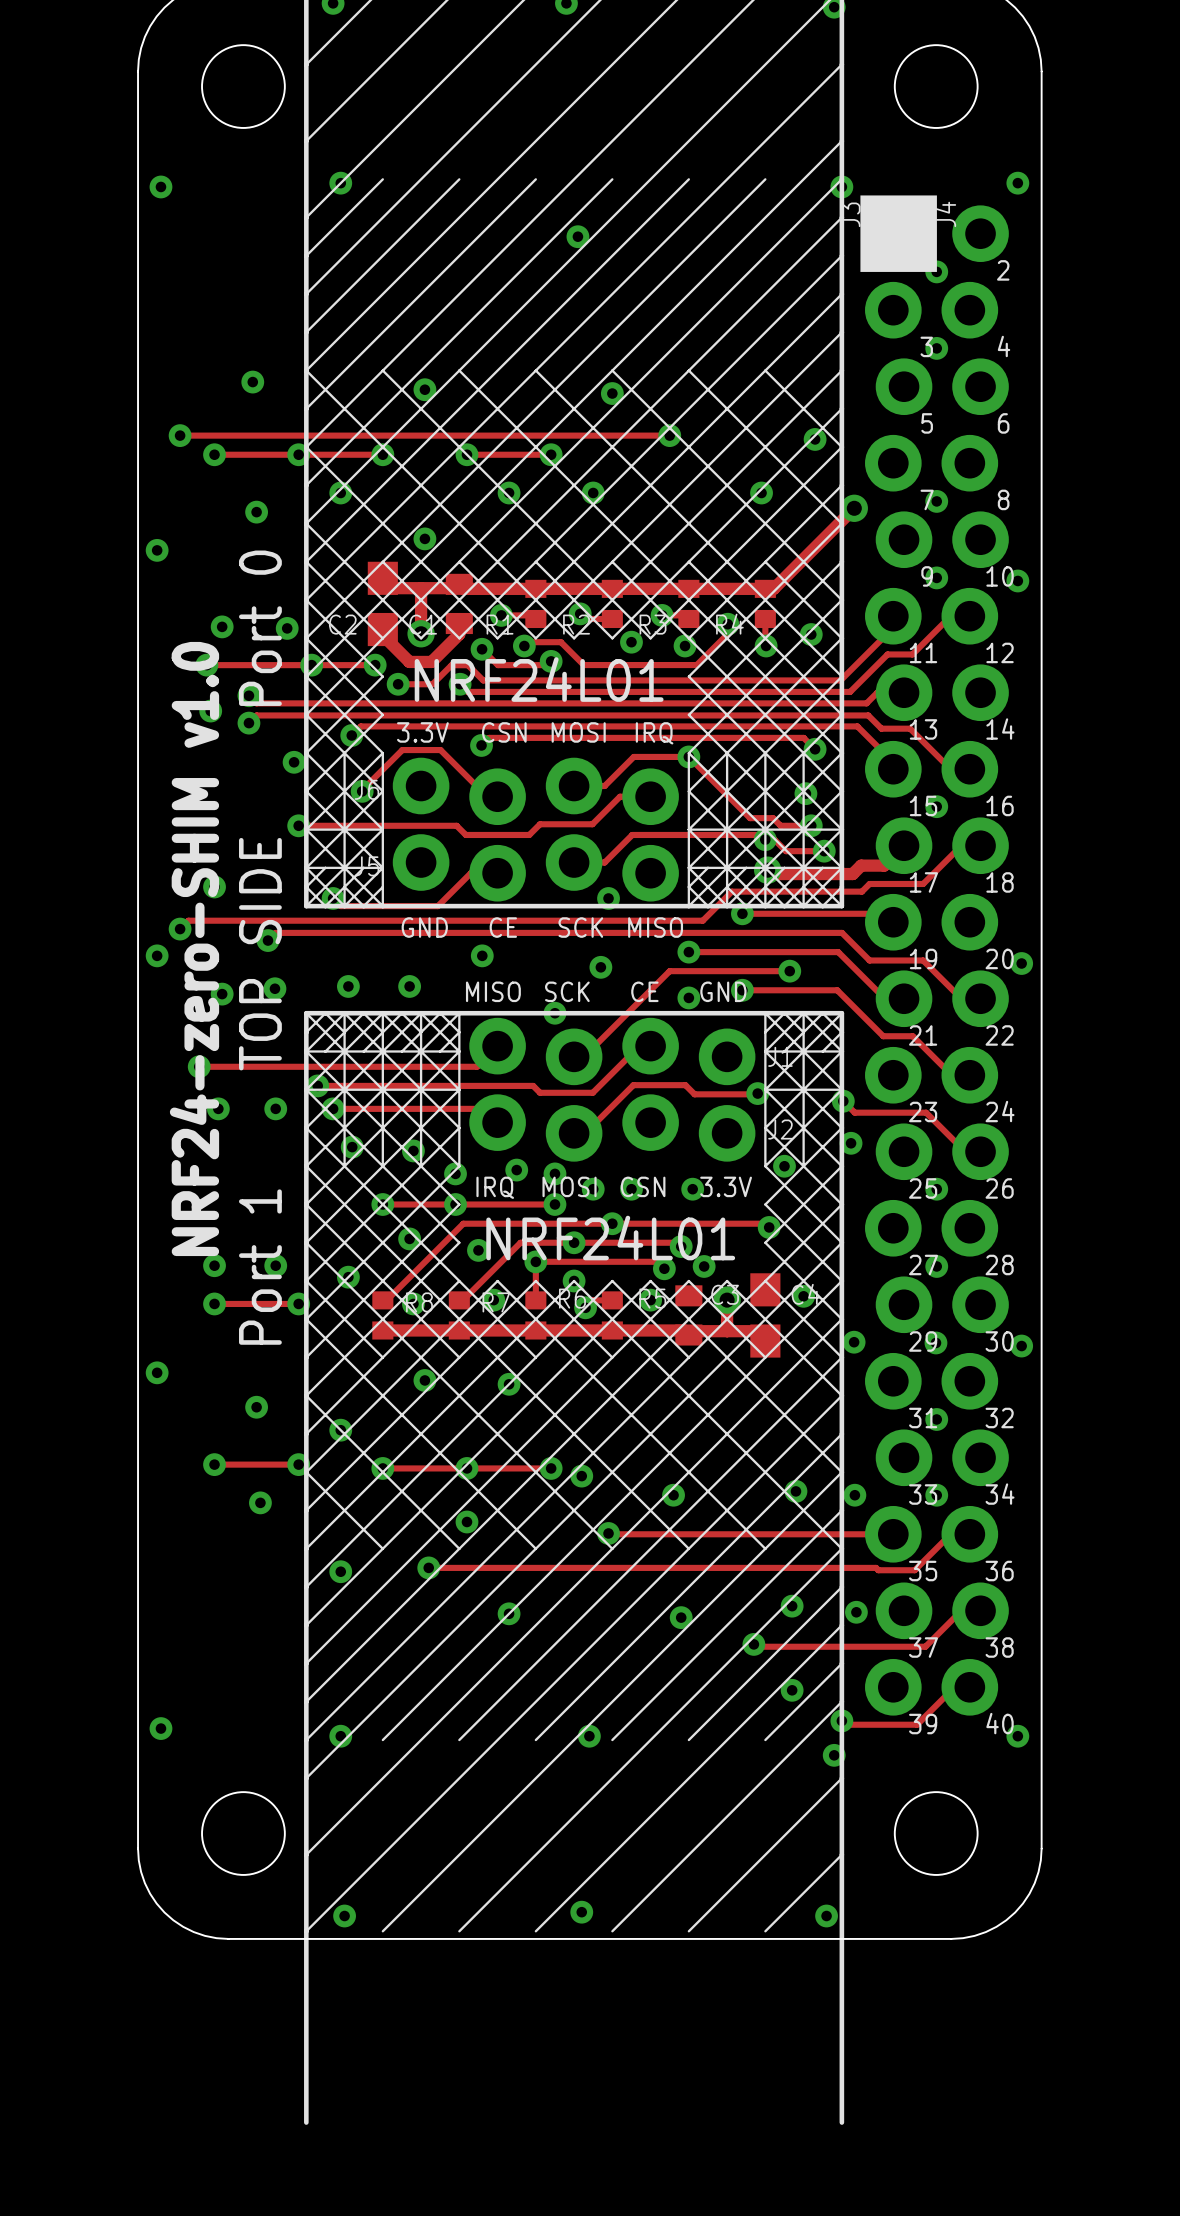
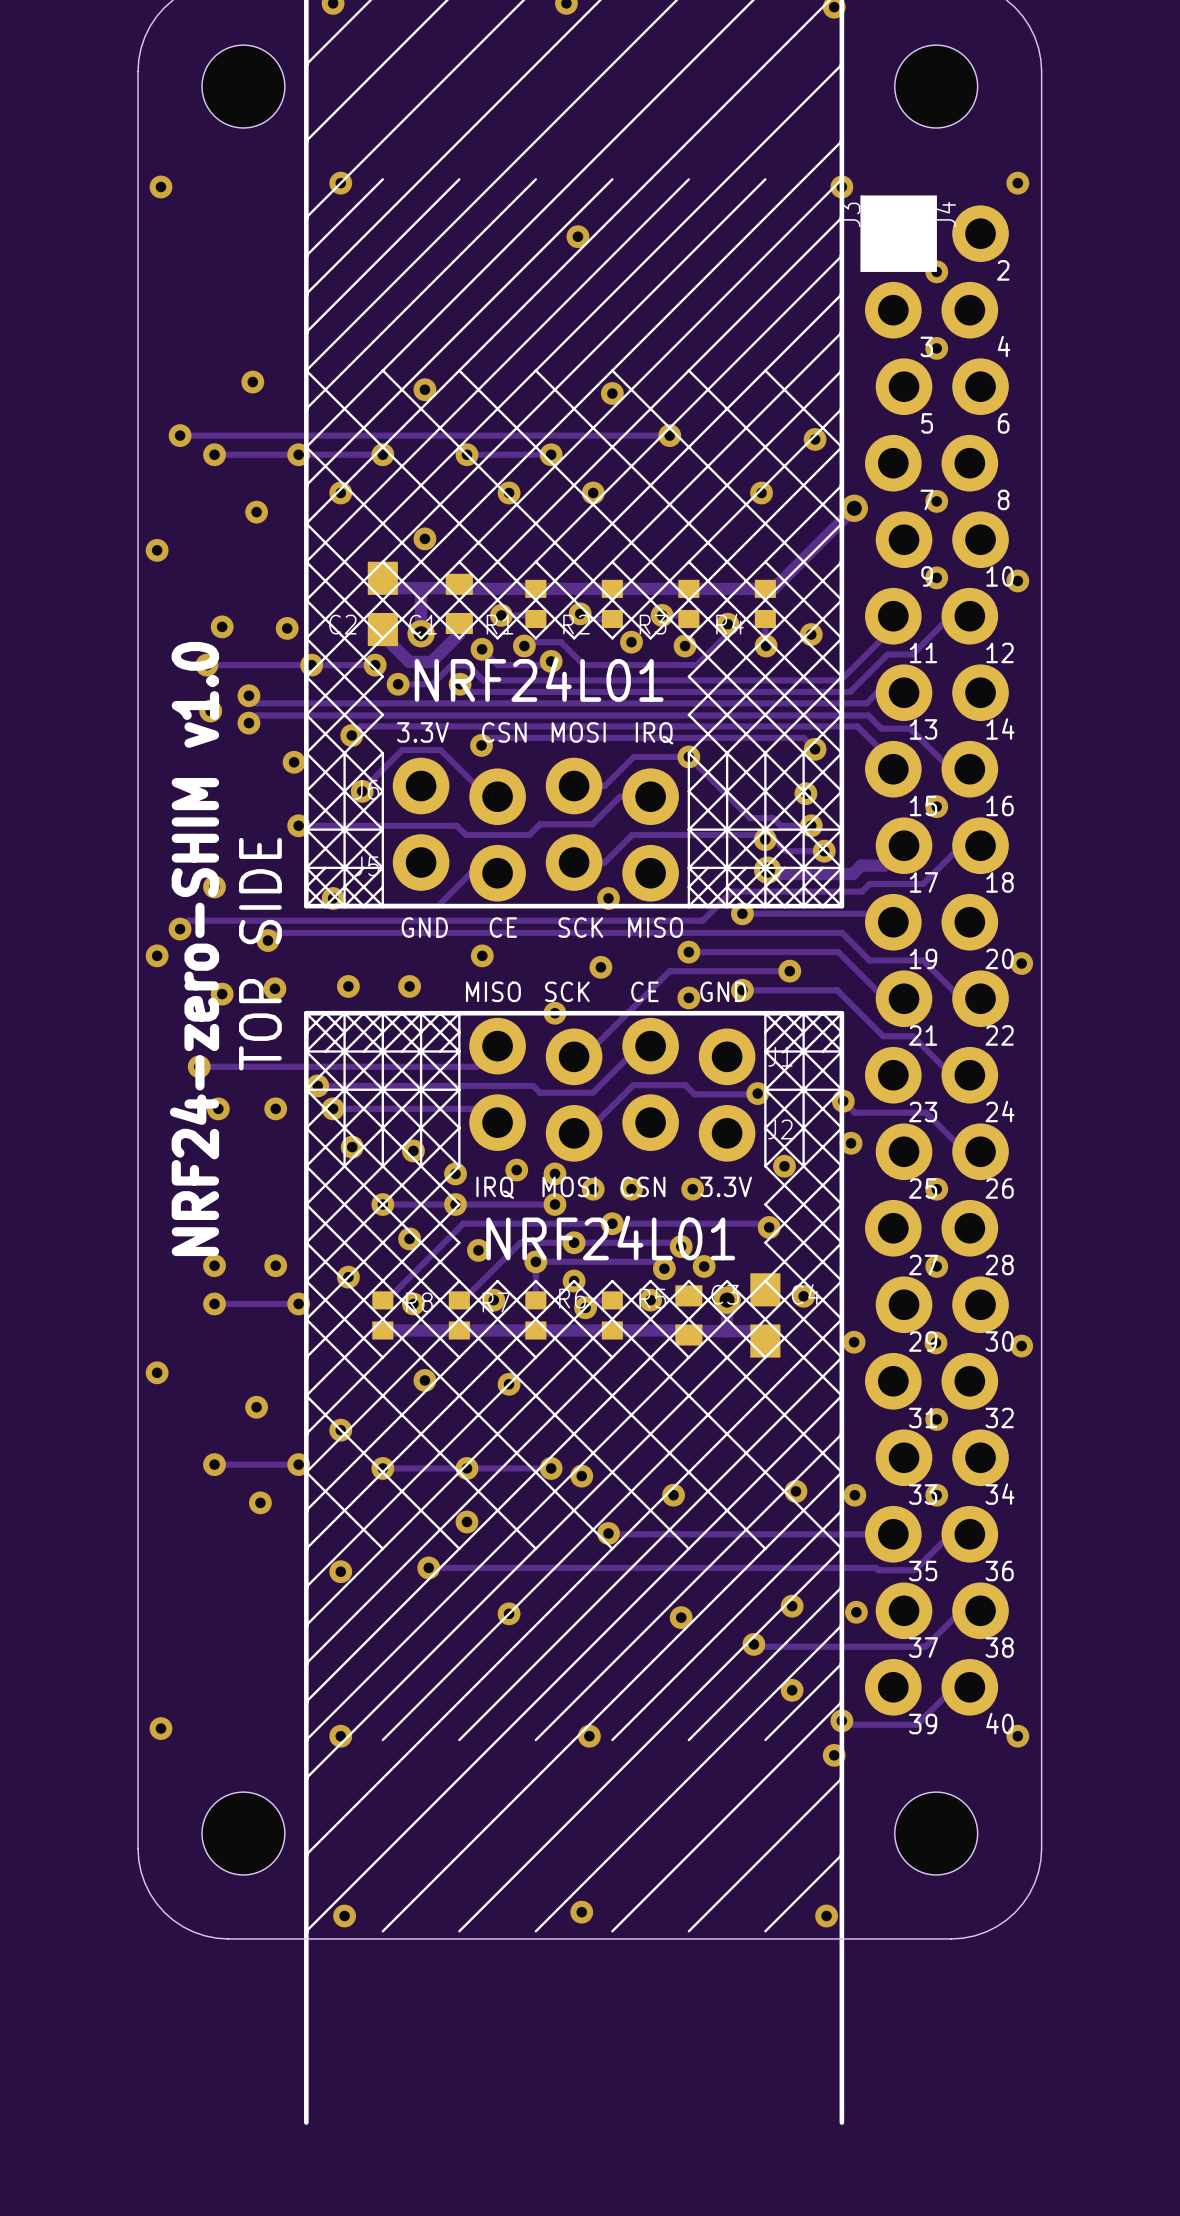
text: Port 0 (260, 628) -> none
text: Port 1 (260, 1267) -> none

